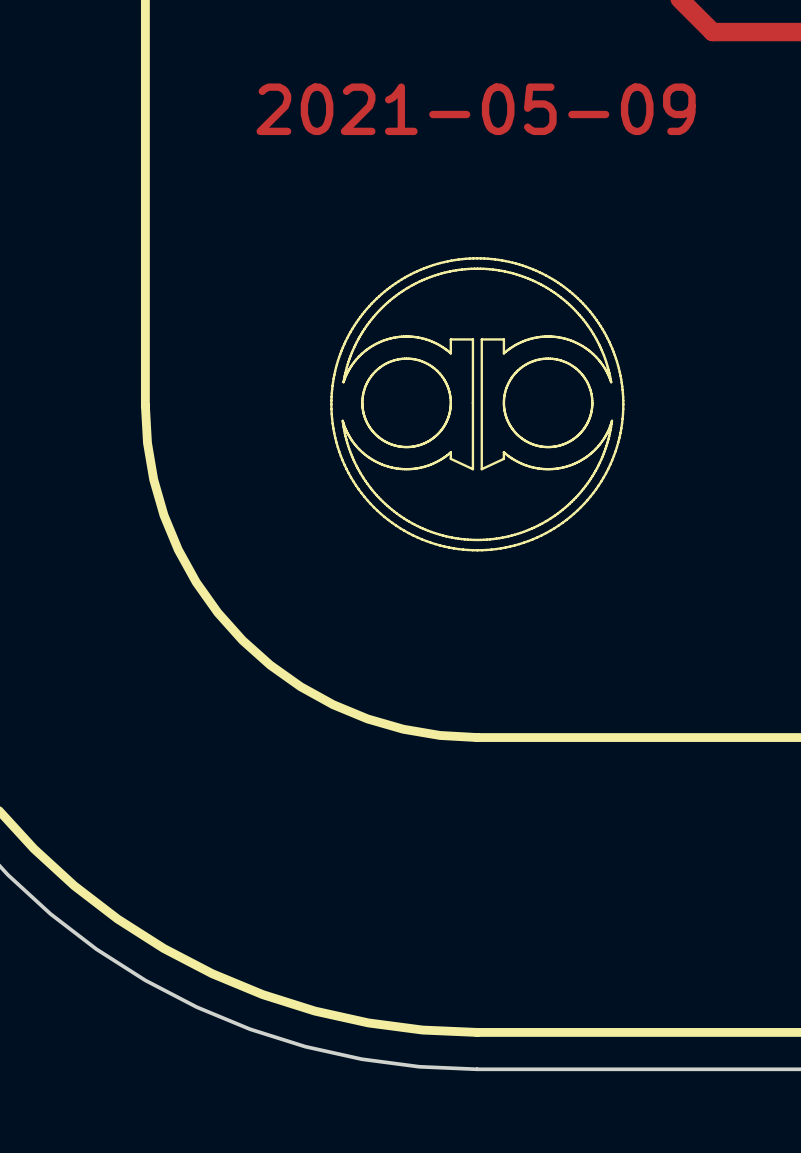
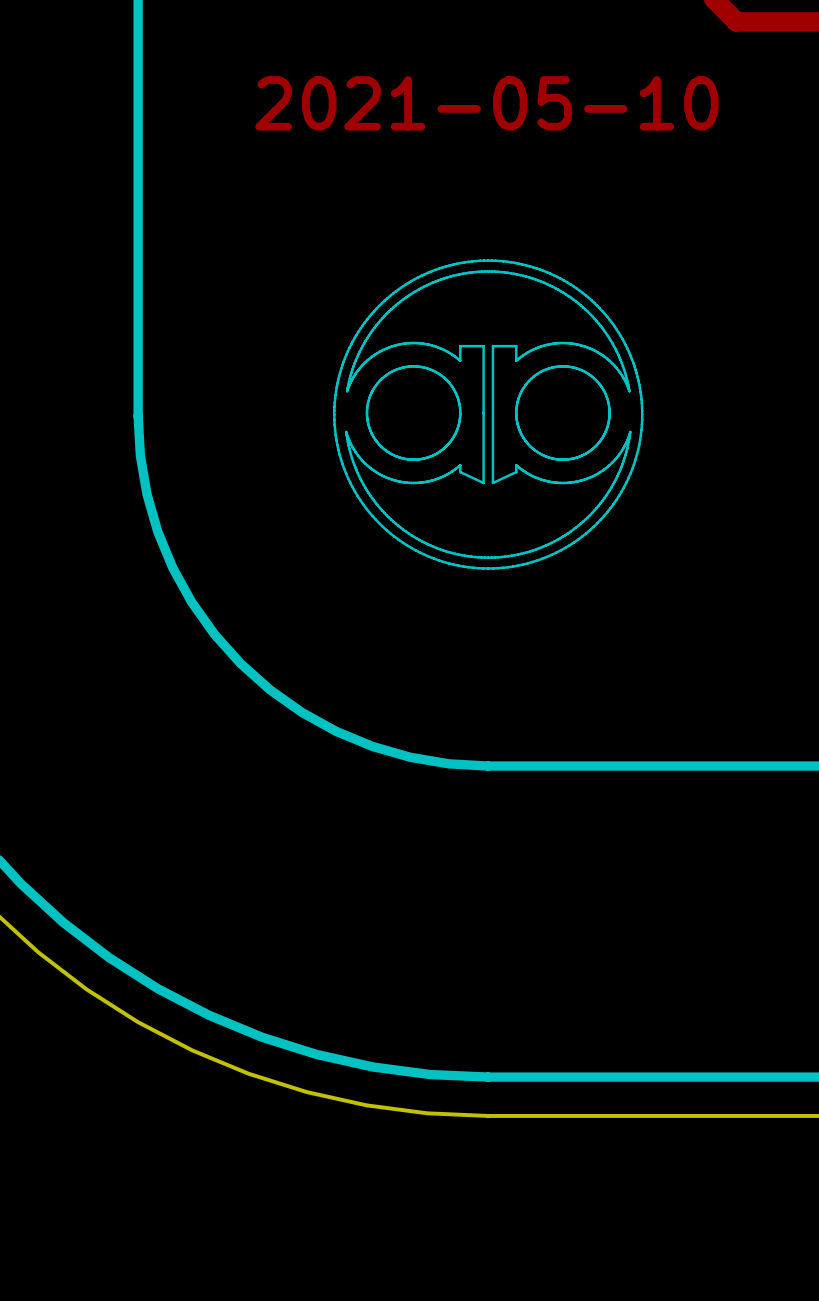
text: 2021-05-09 (476, 109) -> 2021-05-10 (486, 103)

